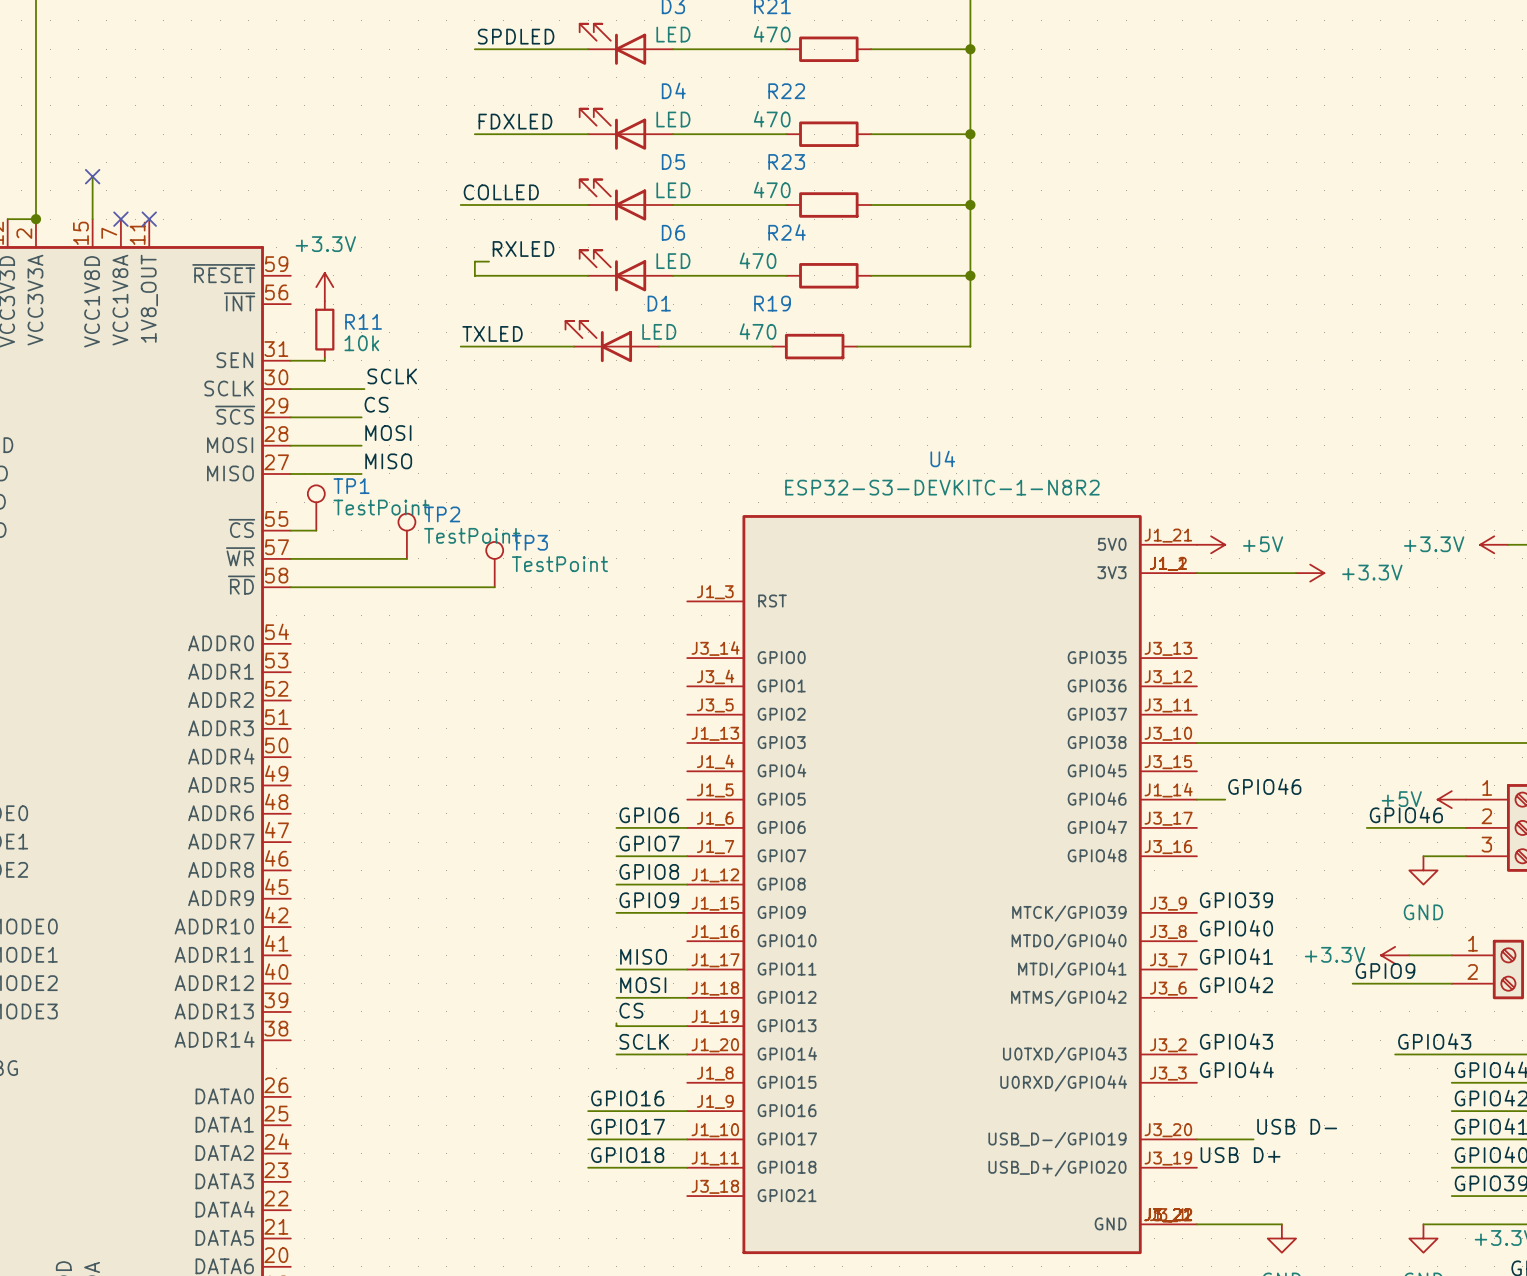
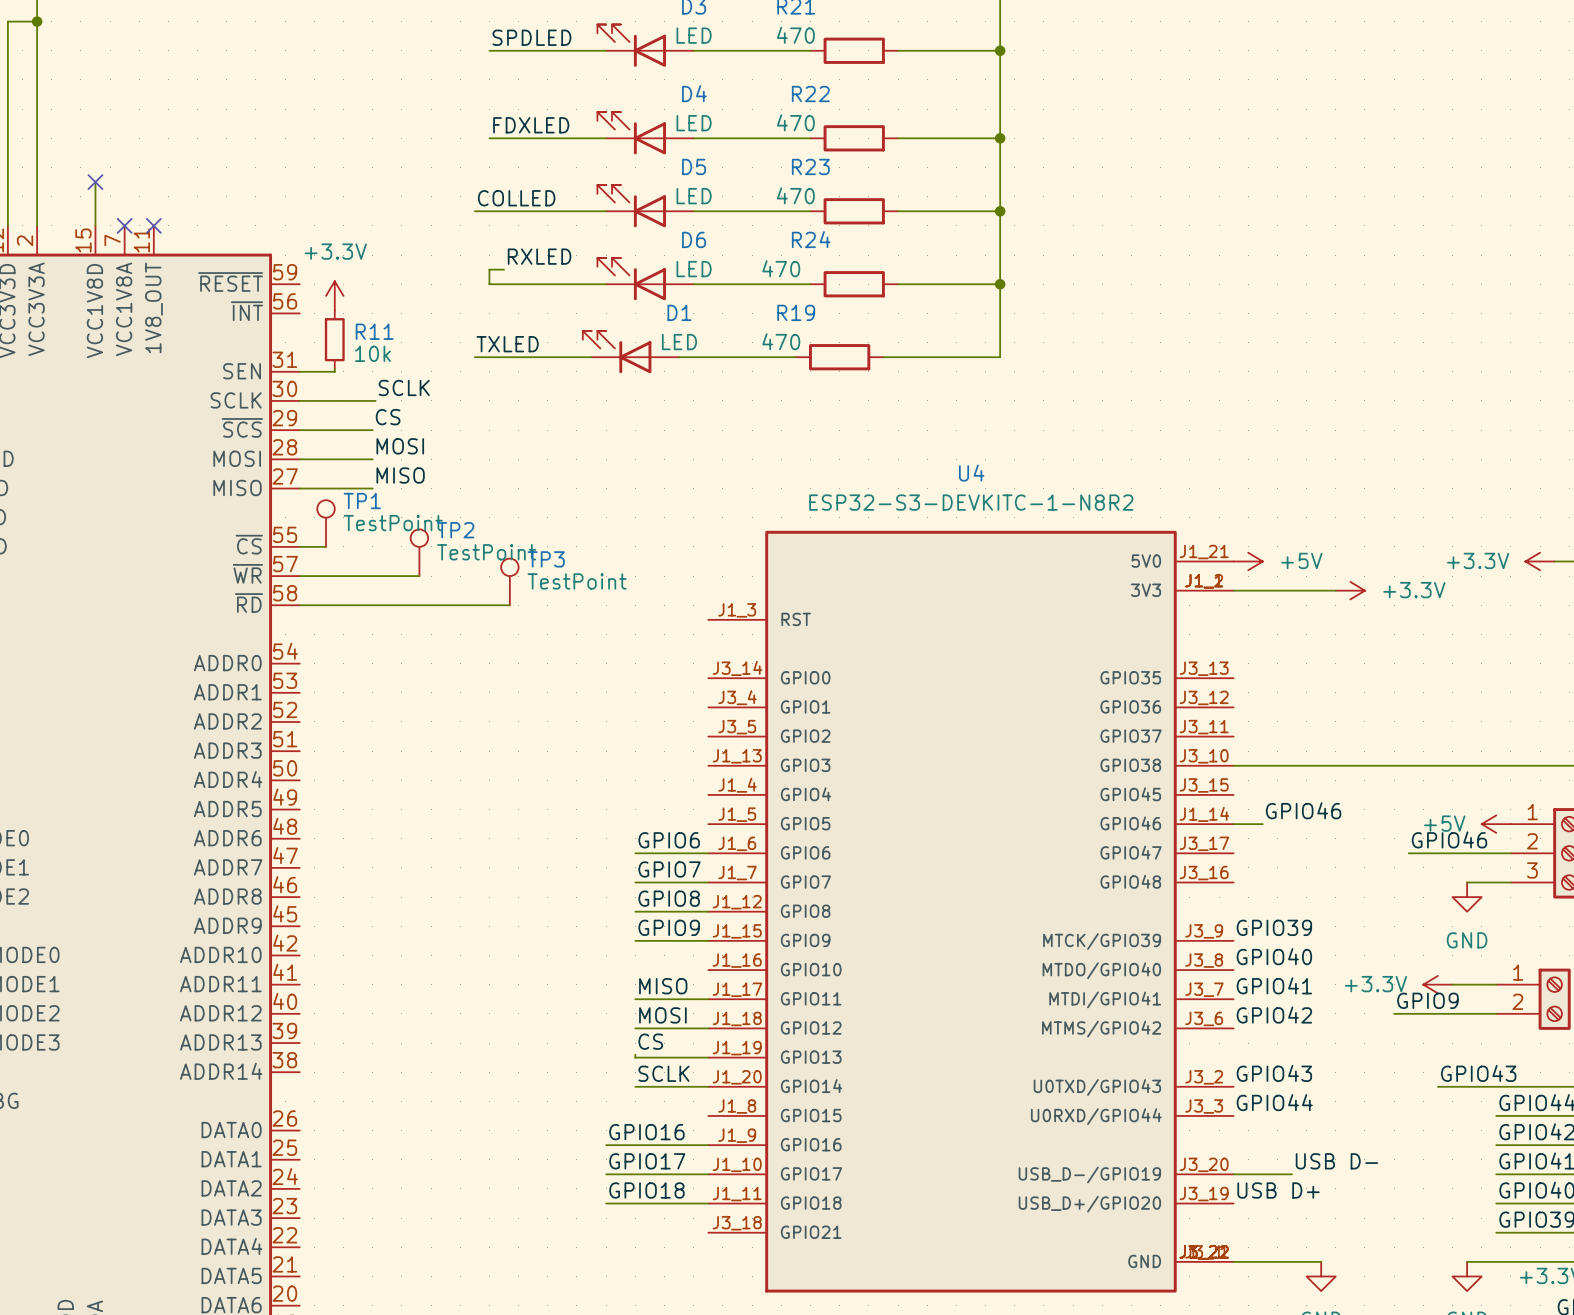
junction: none -> (37, 21)
wire: (7, 219) (35, 219) -> (7, 225) (7, 21) (37, 21)
junction: (35, 219) -> none

